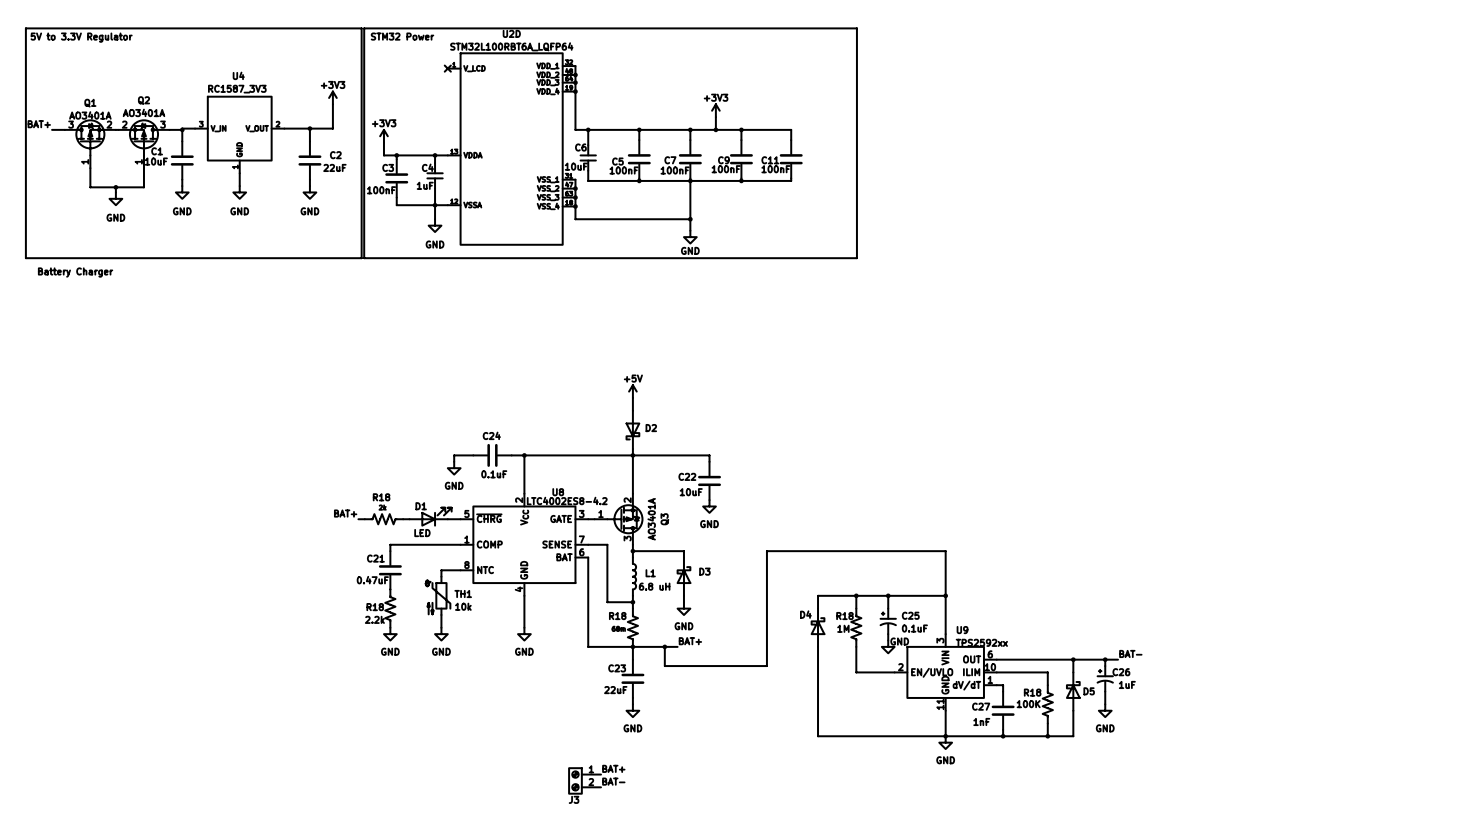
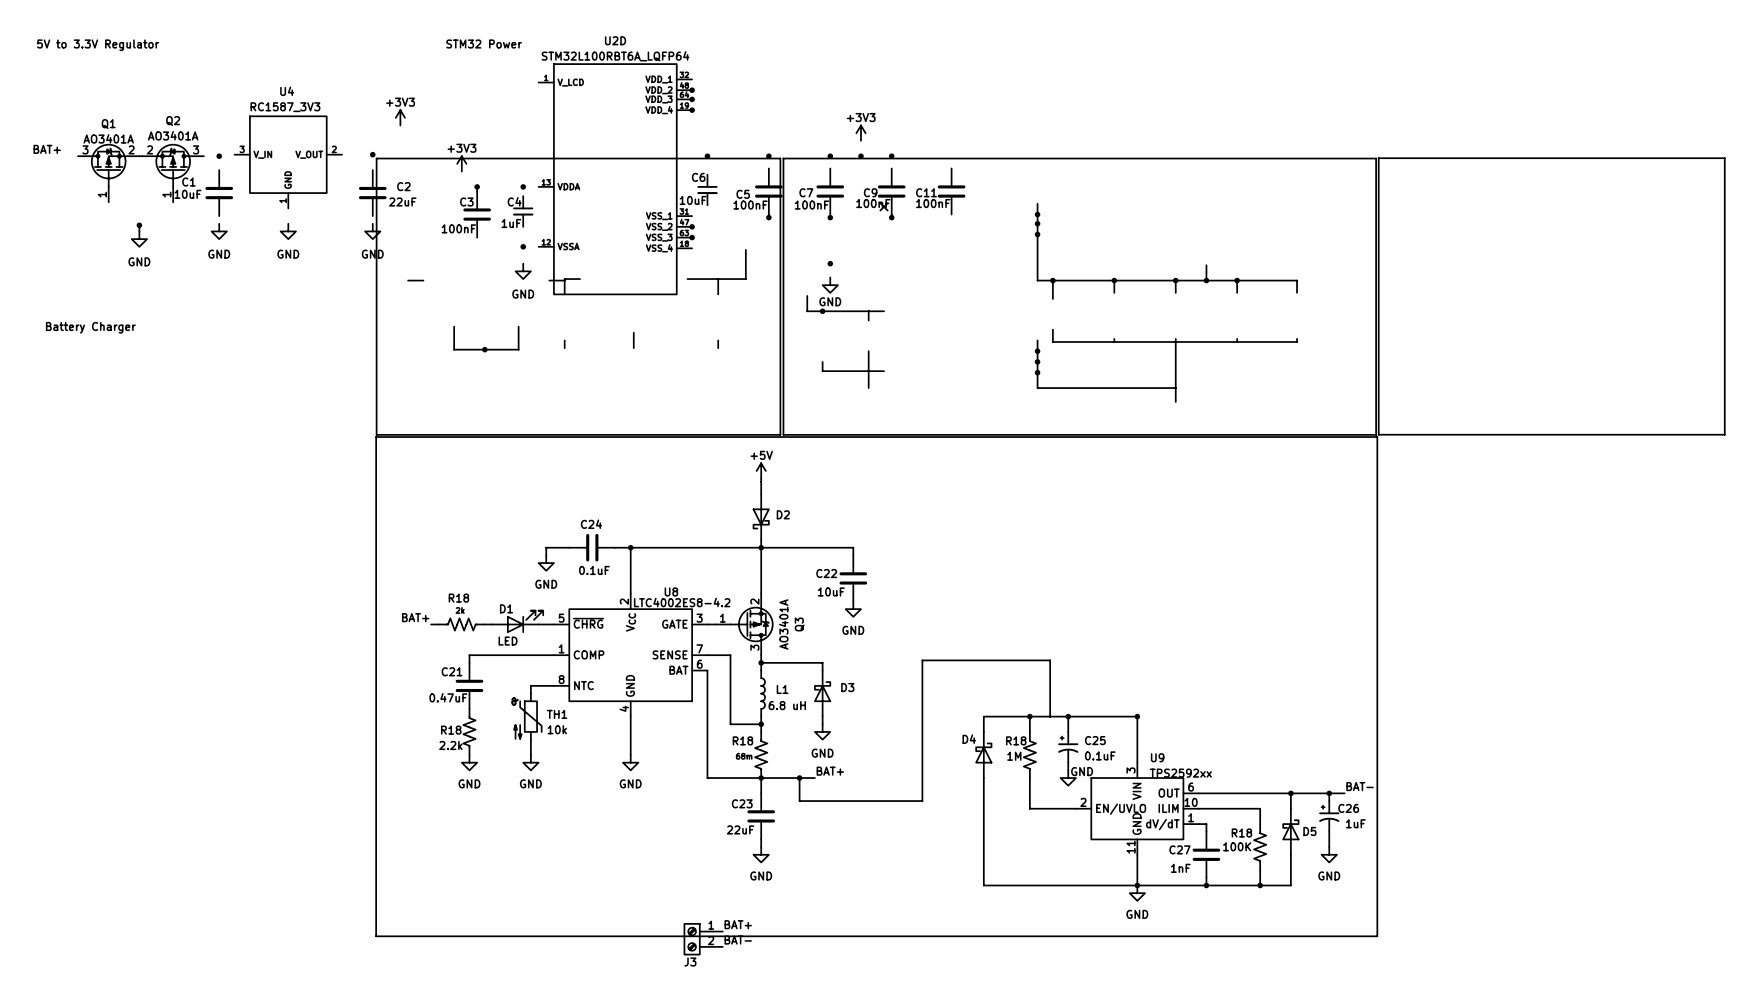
line: (25, 28) (361, 28) (361, 258) (25, 258) (25, 28) -> none
line: (364, 28) (856, 28) (856, 258) (364, 258) (364, 28) -> none
wire: (575, 66) (575, 129) (791, 129) (791, 140) -> none
no-connect mark: (447, 68) -> none
wire: (332, 104) (332, 128) (284, 128) -> none
wire: (715, 117) (715, 129) -> none
wire: (195, 128) (182, 128) (182, 141) -> none
wire: (309, 128) (309, 141) -> none
wire: (52, 129) (64, 129) -> none
wire: (169, 129) (182, 129) -> none
wire: (588, 129) (588, 145) -> none
wire: (639, 129) (639, 140) -> none
wire: (690, 129) (690, 140) -> none
wire: (741, 129) (741, 140) -> none
line: none -> (376, 158) (780, 158) (780, 434) (376, 434) (376, 158)
line: none -> (783, 158) (1376, 158) (1376, 434) (783, 434) (783, 158)
line: none -> (1378, 158) (1724, 158) (1724, 434) (1378, 434) (1378, 158)
wire: (383, 142) (383, 155) (447, 155) -> none
wire: (435, 155) (435, 163) -> none
wire: (90, 168) (90, 187) (143, 187) (143, 168) -> none
wire: none -> (1037, 203) (1037, 280) (1297, 280) (1297, 292)
wire: (588, 170) (588, 180) (791, 180) (791, 178) -> none
no-connect mark: none -> (884, 206)
wire: (239, 173) (239, 186) -> none
wire: (690, 178) (690, 230) -> none
junction: none -> (1037, 214)
wire: (182, 179) (182, 186) -> none
wire: (309, 179) (309, 186) -> none
wire: (575, 179) (575, 219) (690, 219) -> none
junction: none -> (1037, 223)
wire: (435, 188) (435, 219) -> none
junction: none -> (1037, 234)
wire: (396, 197) (396, 205) (447, 205) -> none
junction: (575, 206) -> none
wire: none -> (745, 249) (745, 279) (687, 279)
wire: none -> (1206, 265) (1206, 280)
wire: none -> (580, 279) (564, 279) (564, 294)
wire: none -> (718, 279) (718, 294)
wire: none -> (408, 280) (423, 280)
wire: none -> (549, 280) (564, 280)
wire: none -> (1052, 280) (1052, 299)
junction: none -> (1052, 280)
wire: none -> (1114, 280) (1114, 292)
junction: none -> (1114, 280)
wire: none -> (1175, 280) (1175, 292)
junction: none -> (1175, 280)
junction: none -> (1206, 280)
wire: none -> (1237, 280) (1237, 292)
junction: none -> (1237, 280)
wire: none -> (807, 295) (807, 311) (884, 311)
junction: none -> (822, 311)
wire: none -> (868, 311) (868, 320)
wire: none -> (454, 326) (454, 349) (518, 349) (518, 326)
wire: none -> (1052, 329) (1052, 341) (1297, 341) (1297, 338)
wire: none -> (633, 332) (633, 348)
wire: none -> (1114, 338) (1114, 341)
wire: none -> (1175, 338) (1175, 401)
wire: none -> (1237, 338) (1237, 341)
wire: none -> (564, 340) (564, 348)
wire: none -> (718, 340) (718, 348)
wire: none -> (1037, 340) (1037, 388) (1175, 388)
junction: none -> (484, 349)
wire: none -> (868, 351) (868, 388)
junction: none -> (1037, 351)
wire: none -> (822, 361) (822, 371) (884, 371)
junction: none -> (1037, 361)
junction: none -> (1037, 372)
line: none -> (376, 437) (1377, 437) (1377, 936) (376, 936) (376, 437)
wire: (766, 551) (945, 551) (945, 595) -> (922, 662) (922, 660) (1050, 660) (1050, 716)

